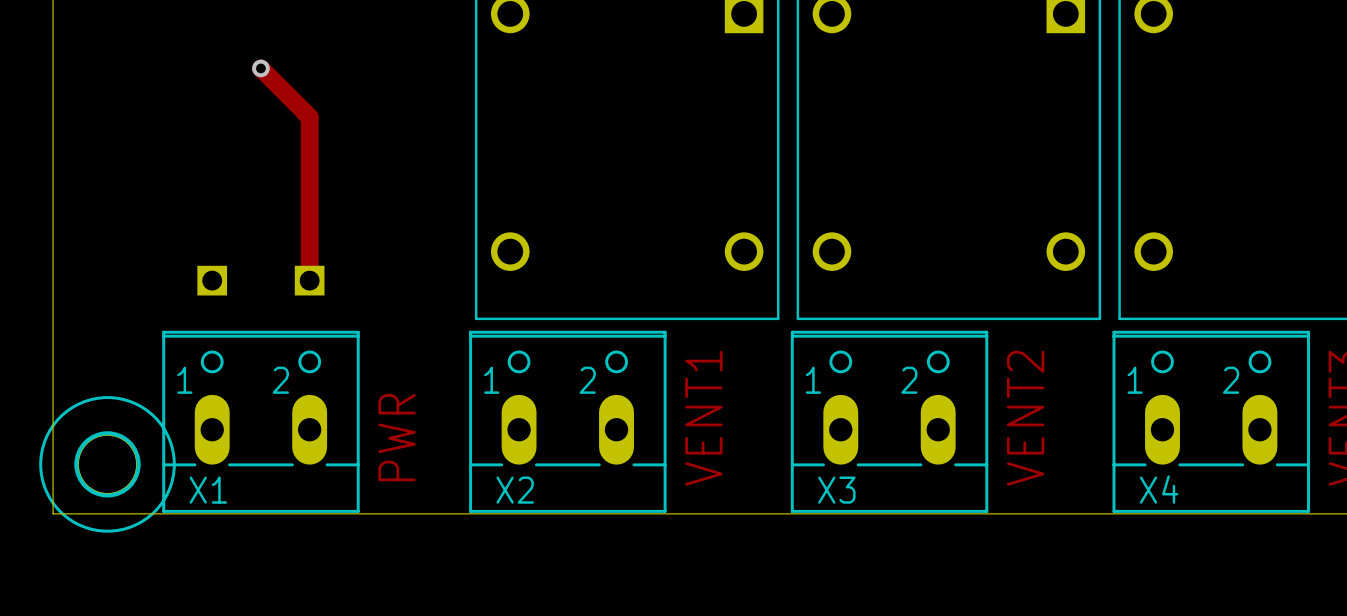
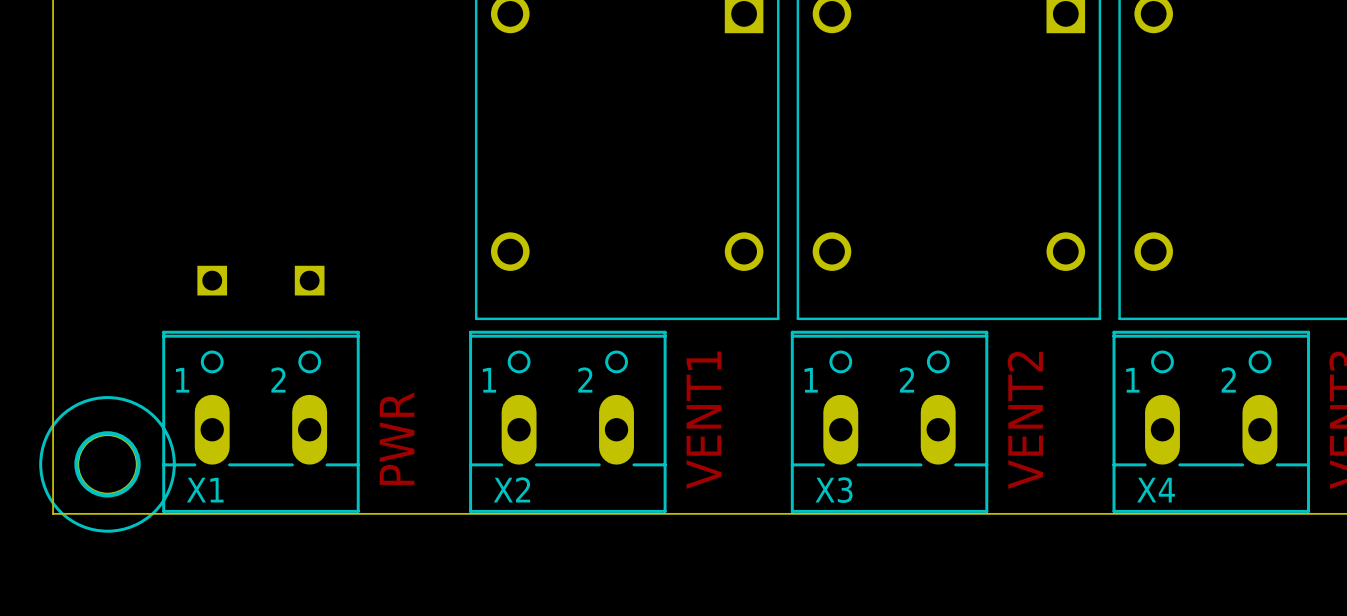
track: (260, 68) (309, 117) (309, 280) -> none
via: (260, 68) -> none

